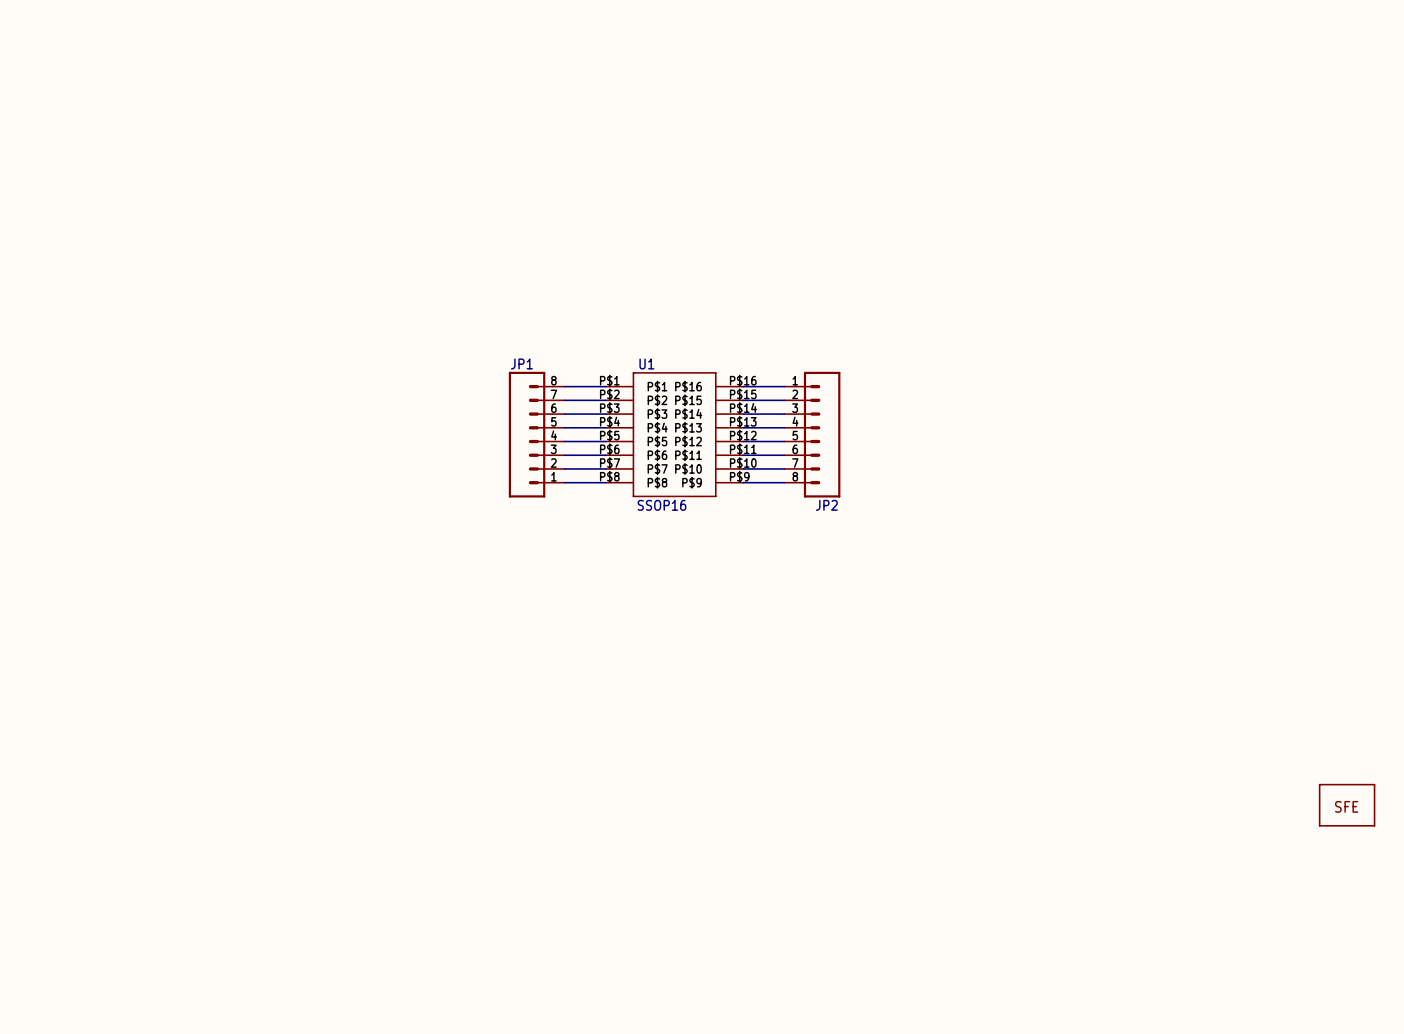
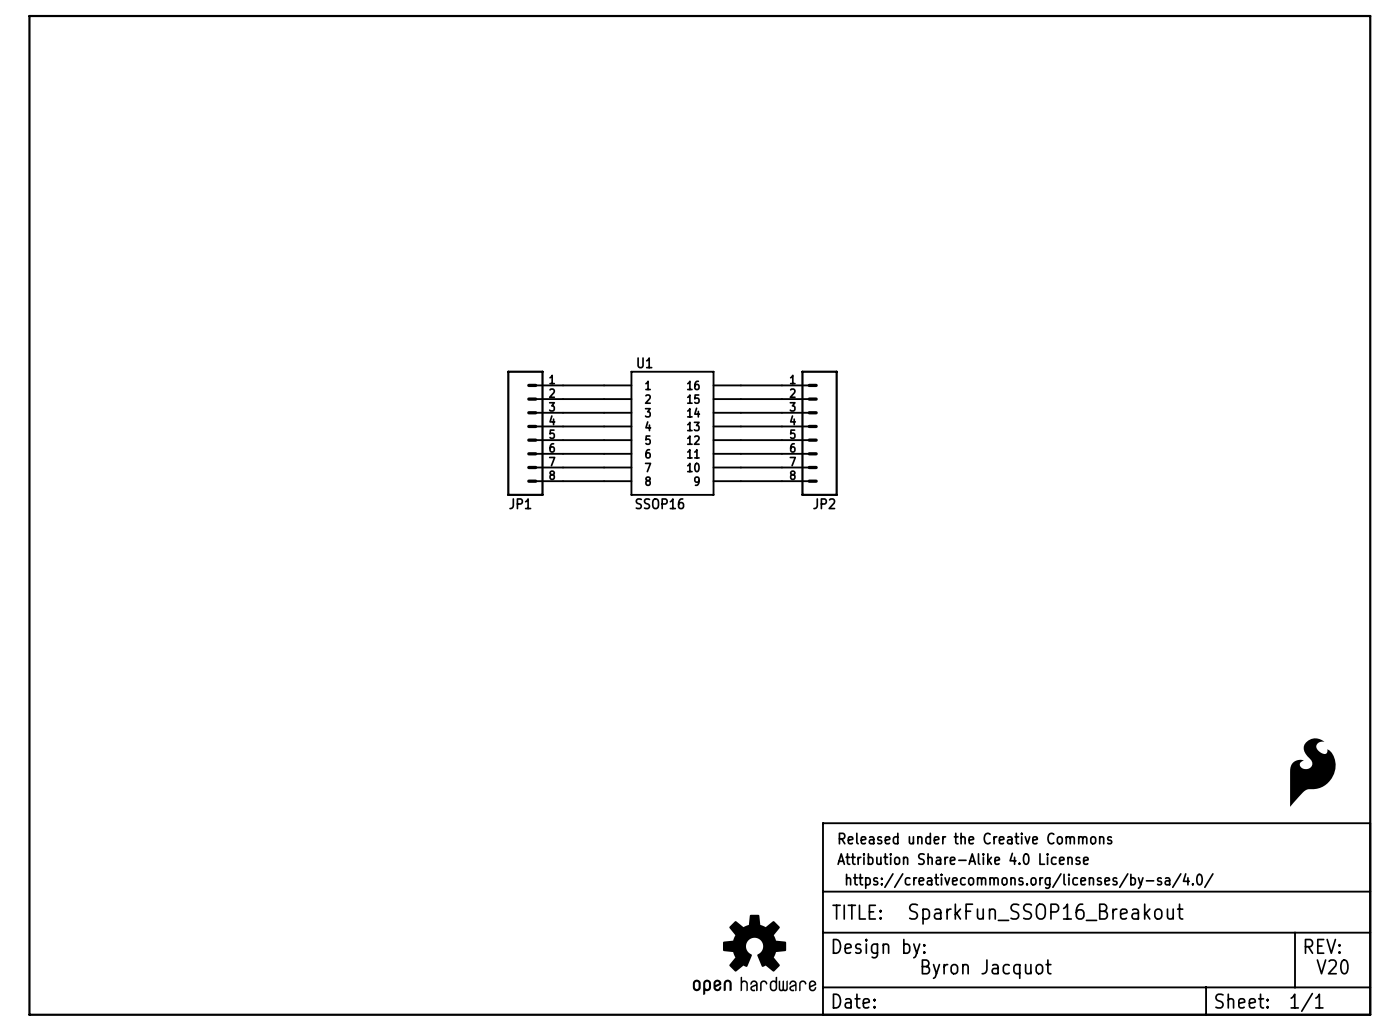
U1 symbol: [605, 372, 744, 498] -> [604, 371, 741, 496]
JP1 flip: as is (527, 434) -> up-down (525, 433)
part: none -> (699, 515)
part: none -> (1312, 772)
part: (1347, 805) -> none
part: none -> (1096, 918)
part: none -> (754, 954)
text: none -> V20 (1332, 966)
text: none -> Byron Jacquot (986, 969)

